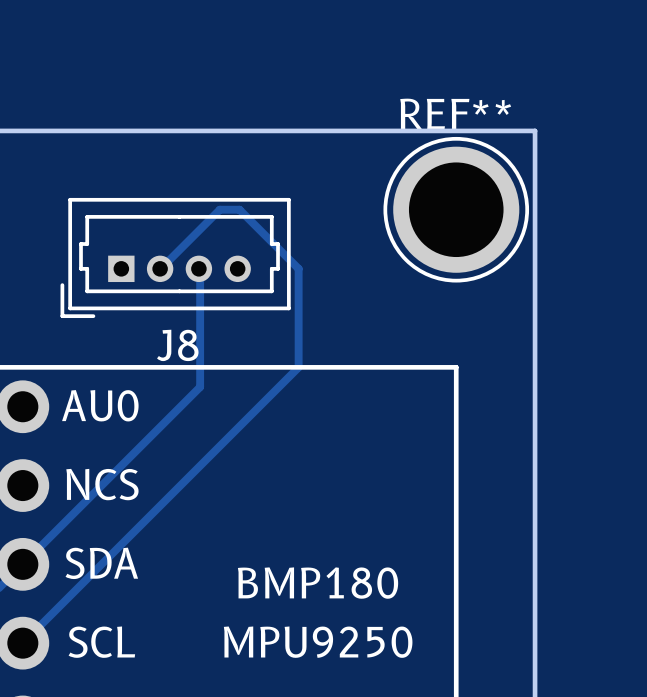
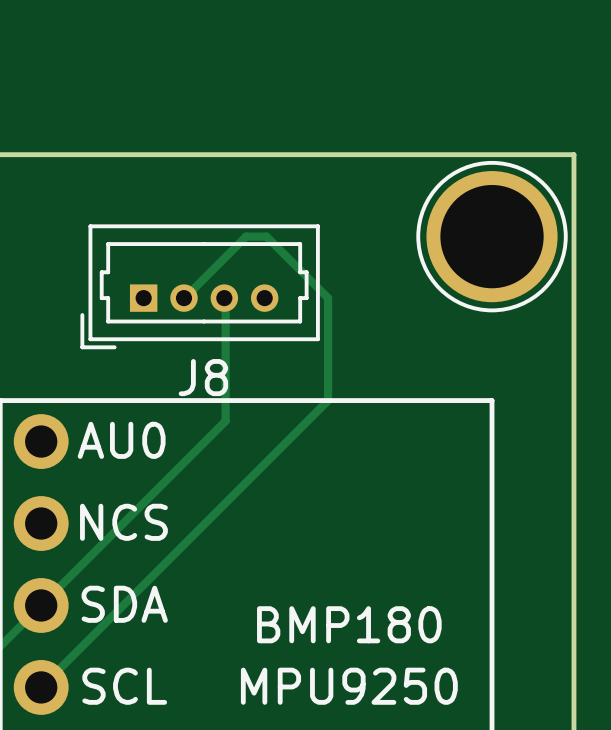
REF**: (456, 209) -> none
part: none -> (492, 236)

